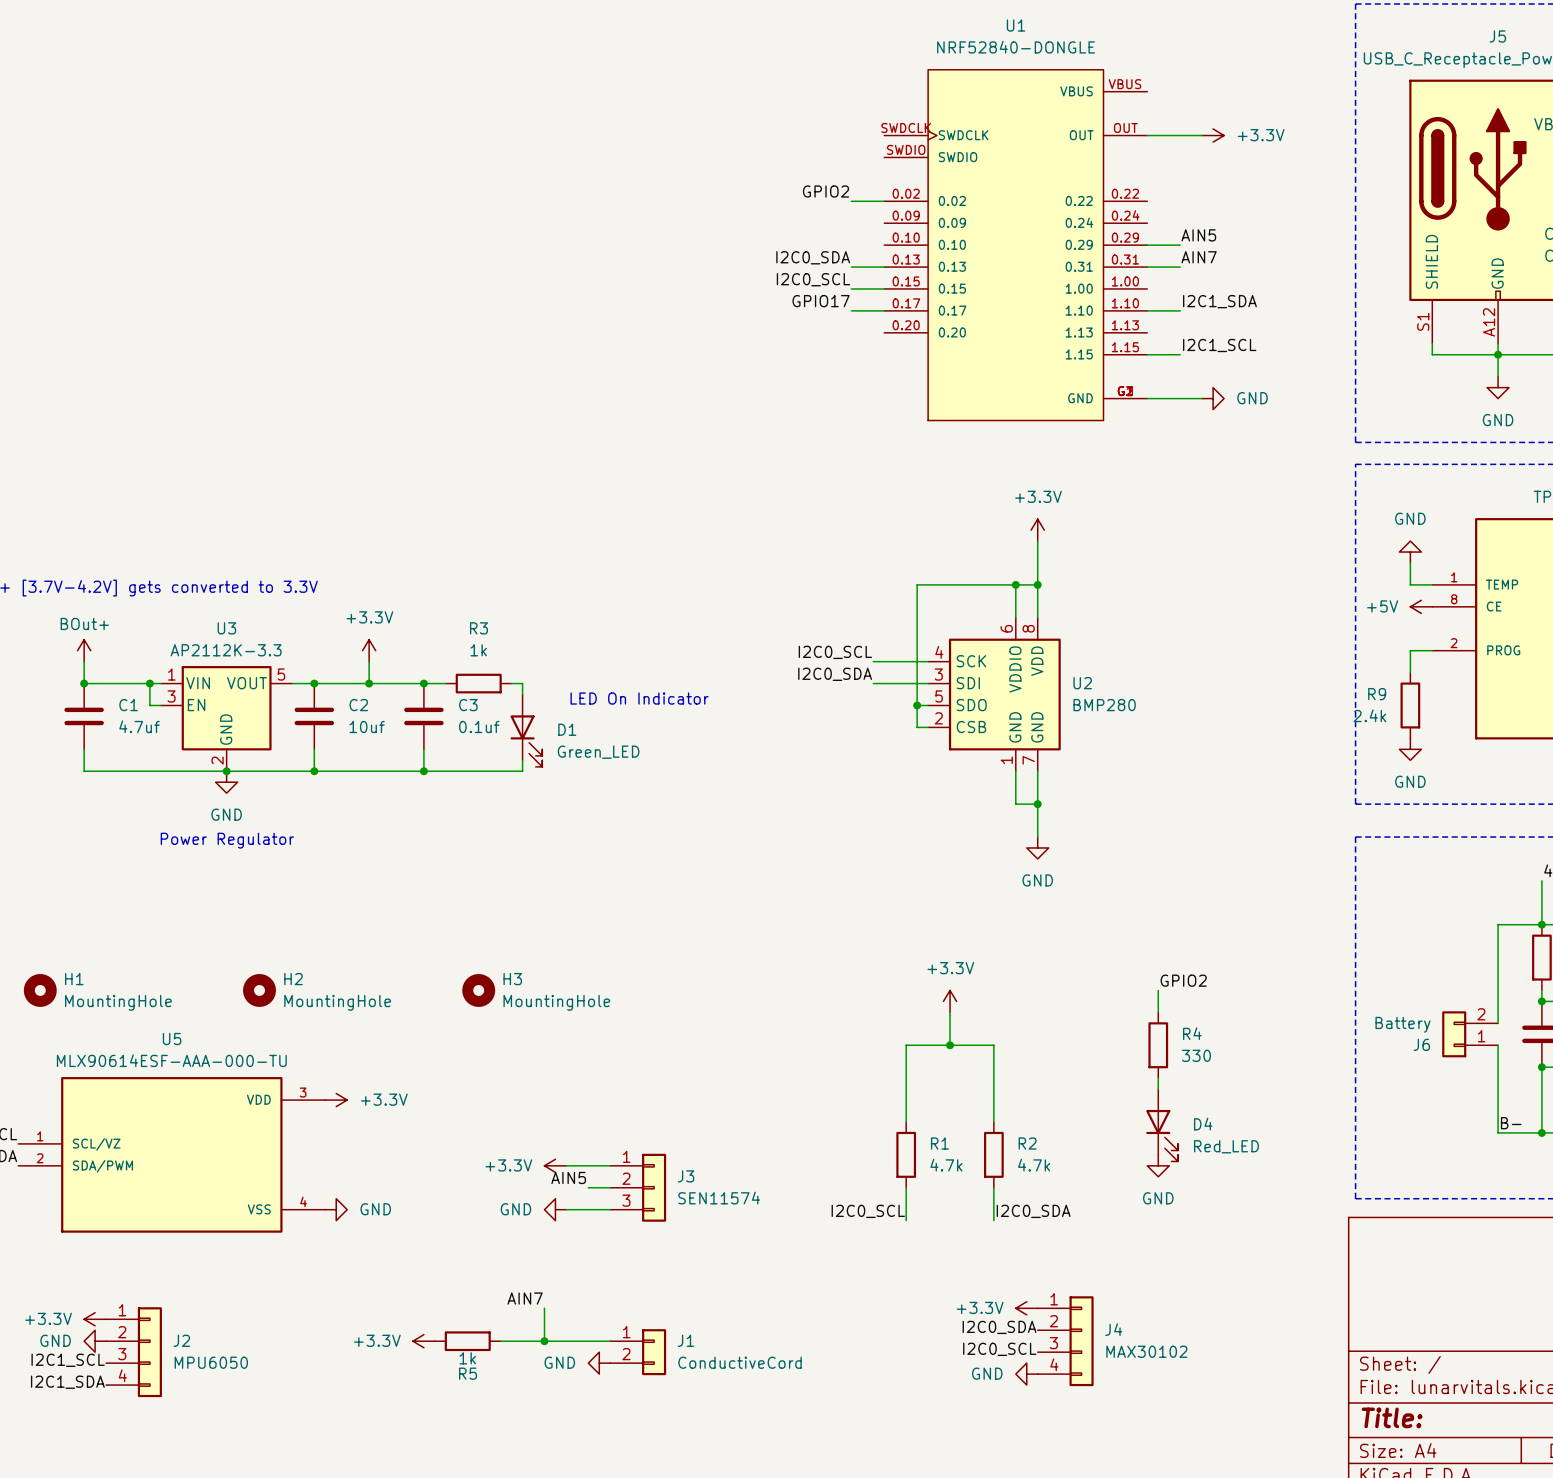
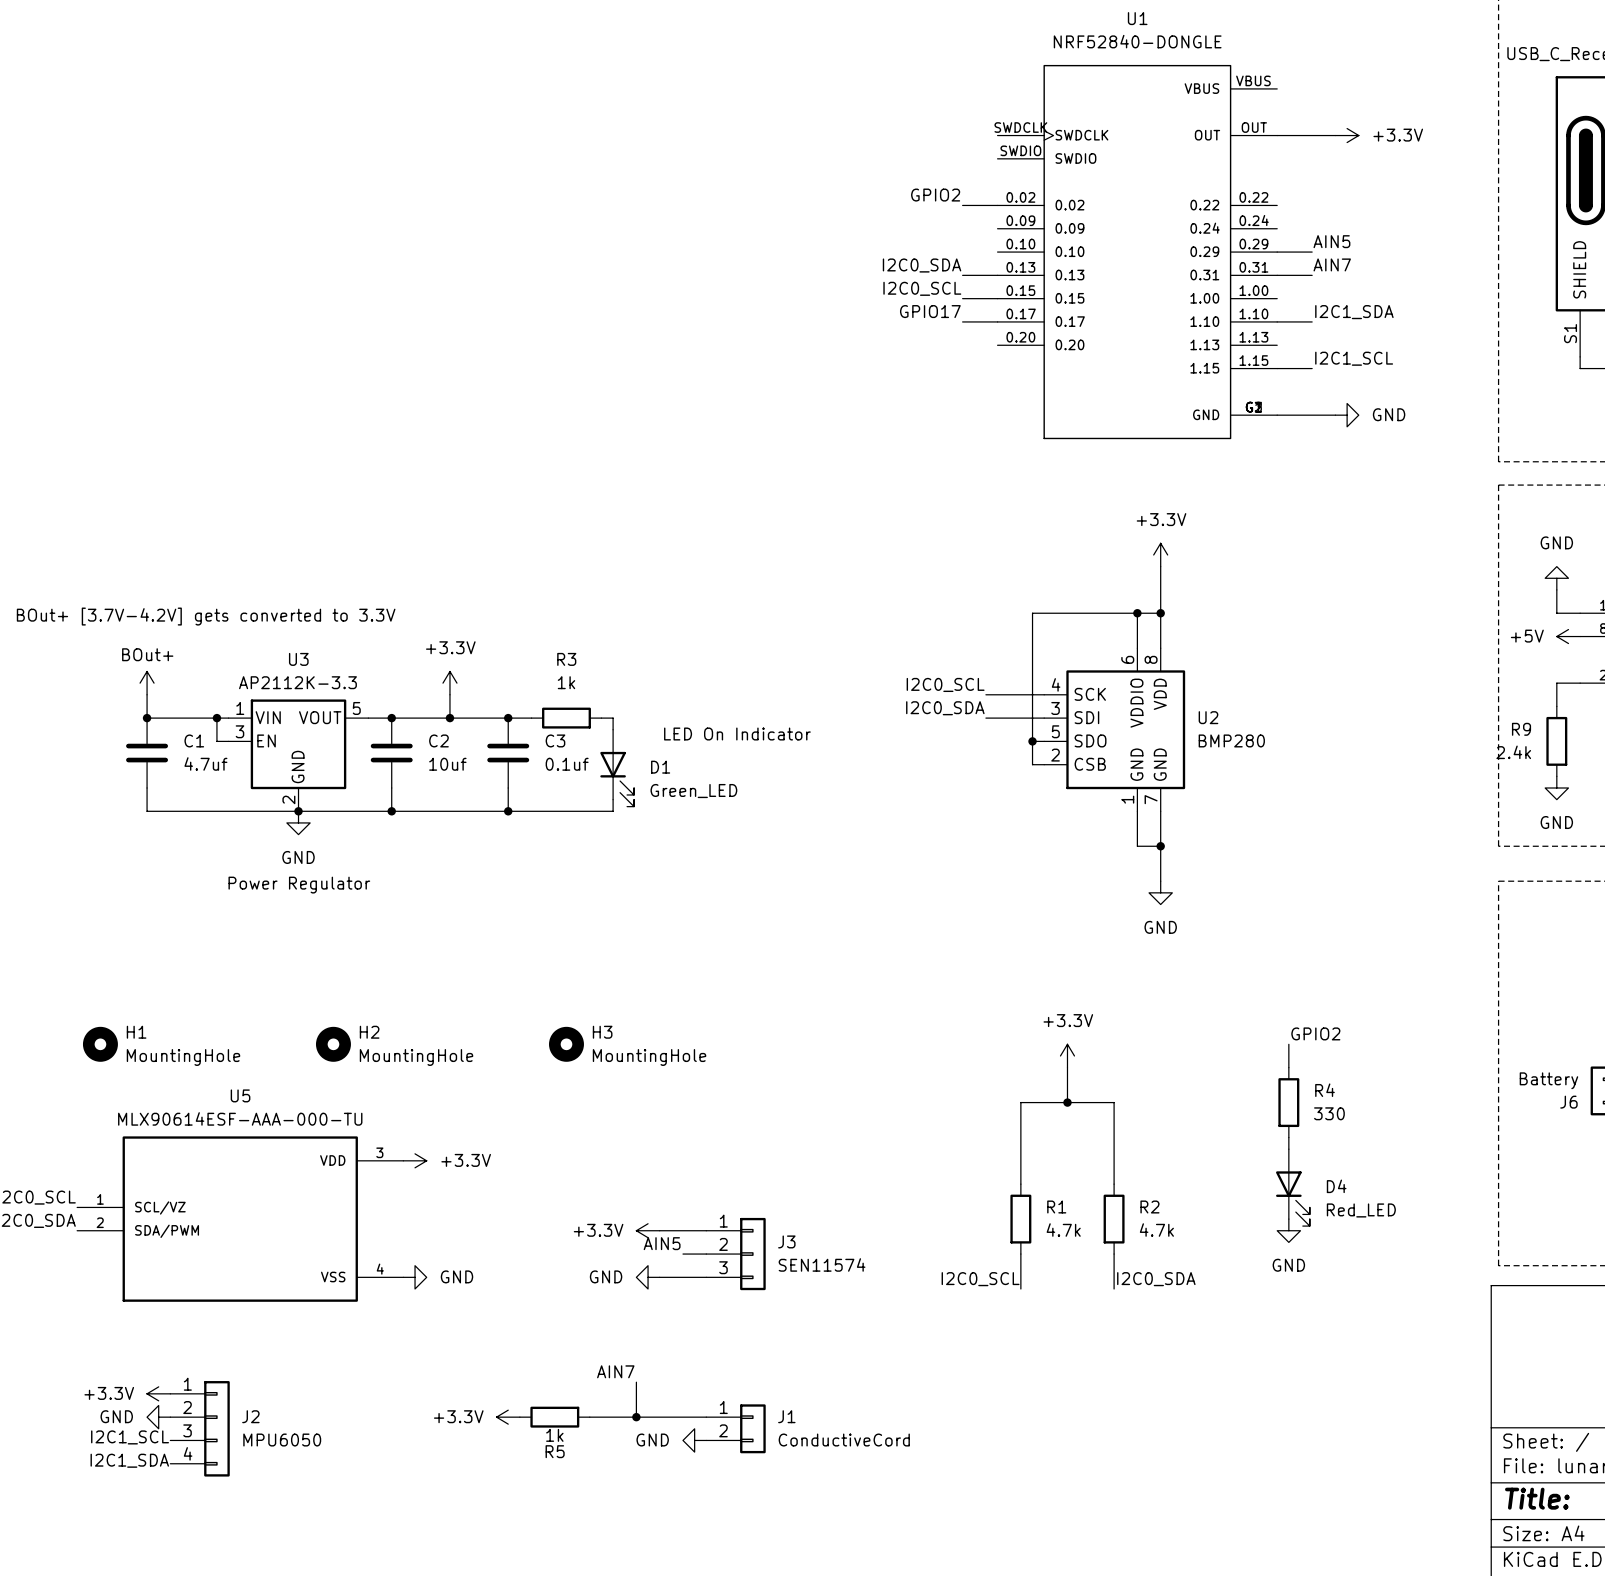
power symbol: +3.3V (1026, 1308) -> none
label: I2C0_SDA (999, 1327) -> none
J4: MAX30102 (1065, 1341) -> none
label: I2C0_SCL (999, 1349) -> none
power symbol: GND (1026, 1374) -> none

